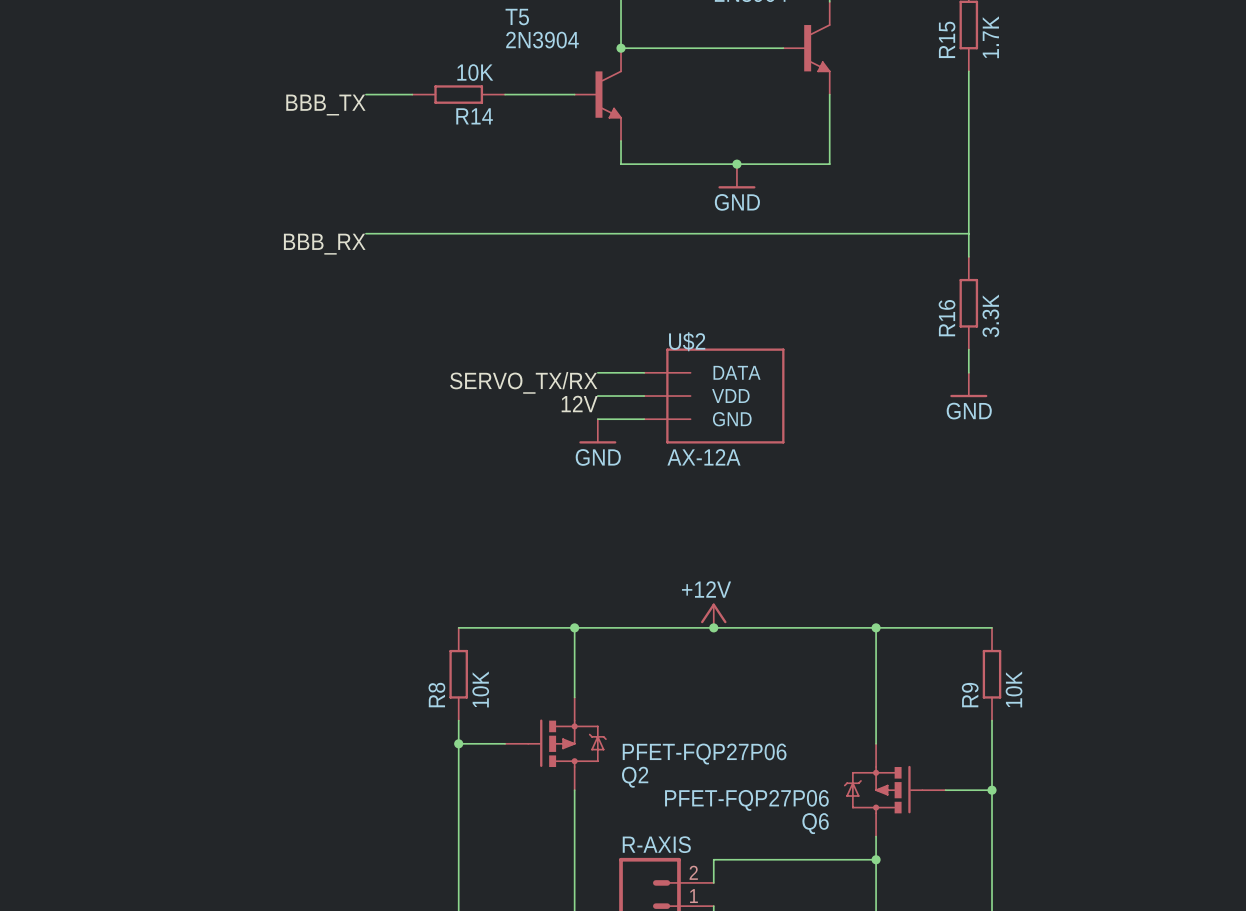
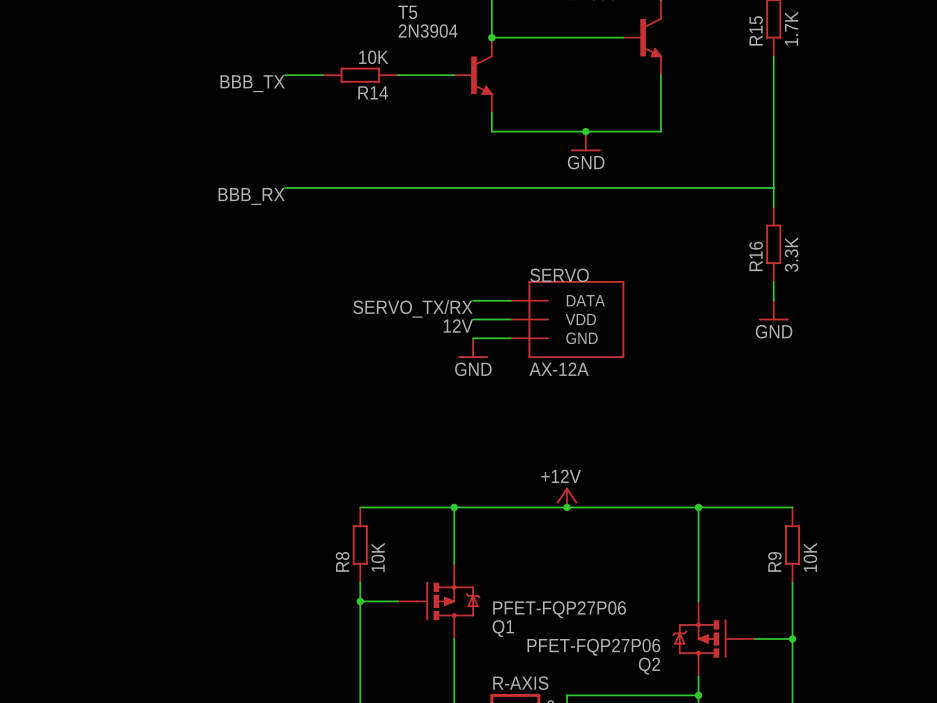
U$2 name: U$2 (687, 341) -> SERVO (559, 275)
Q2 name: Q2 (635, 777) -> Q1 (503, 628)
Q6 name: Q6 (815, 823) -> Q2 (649, 666)

